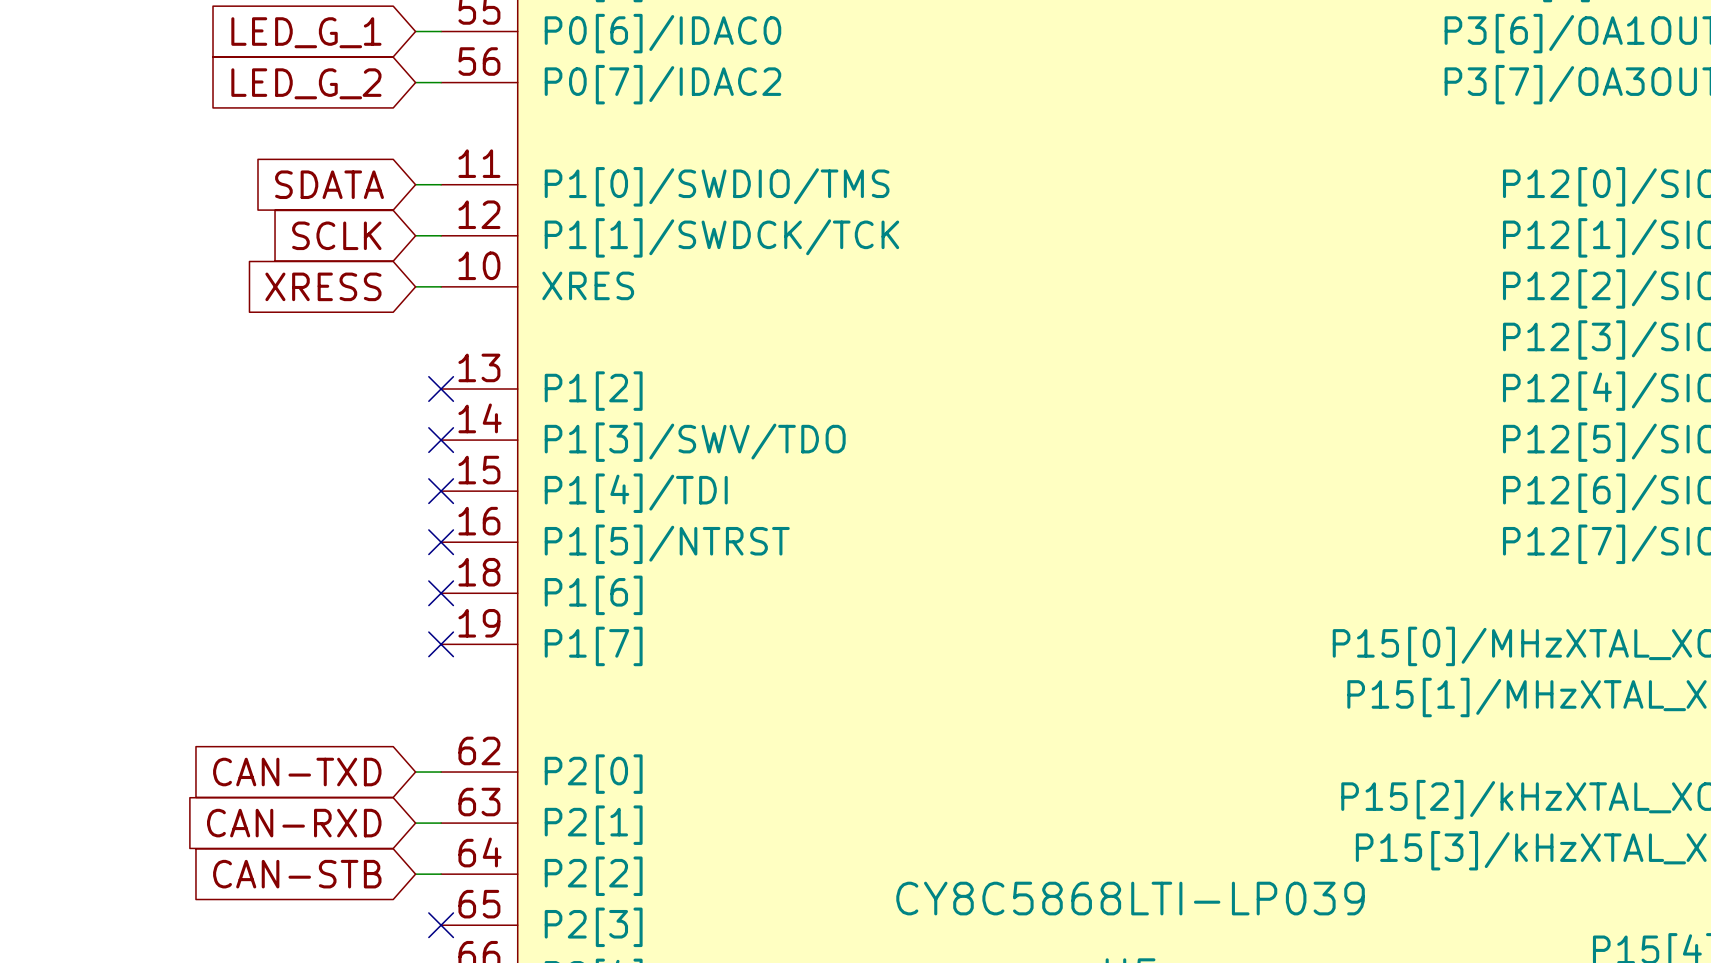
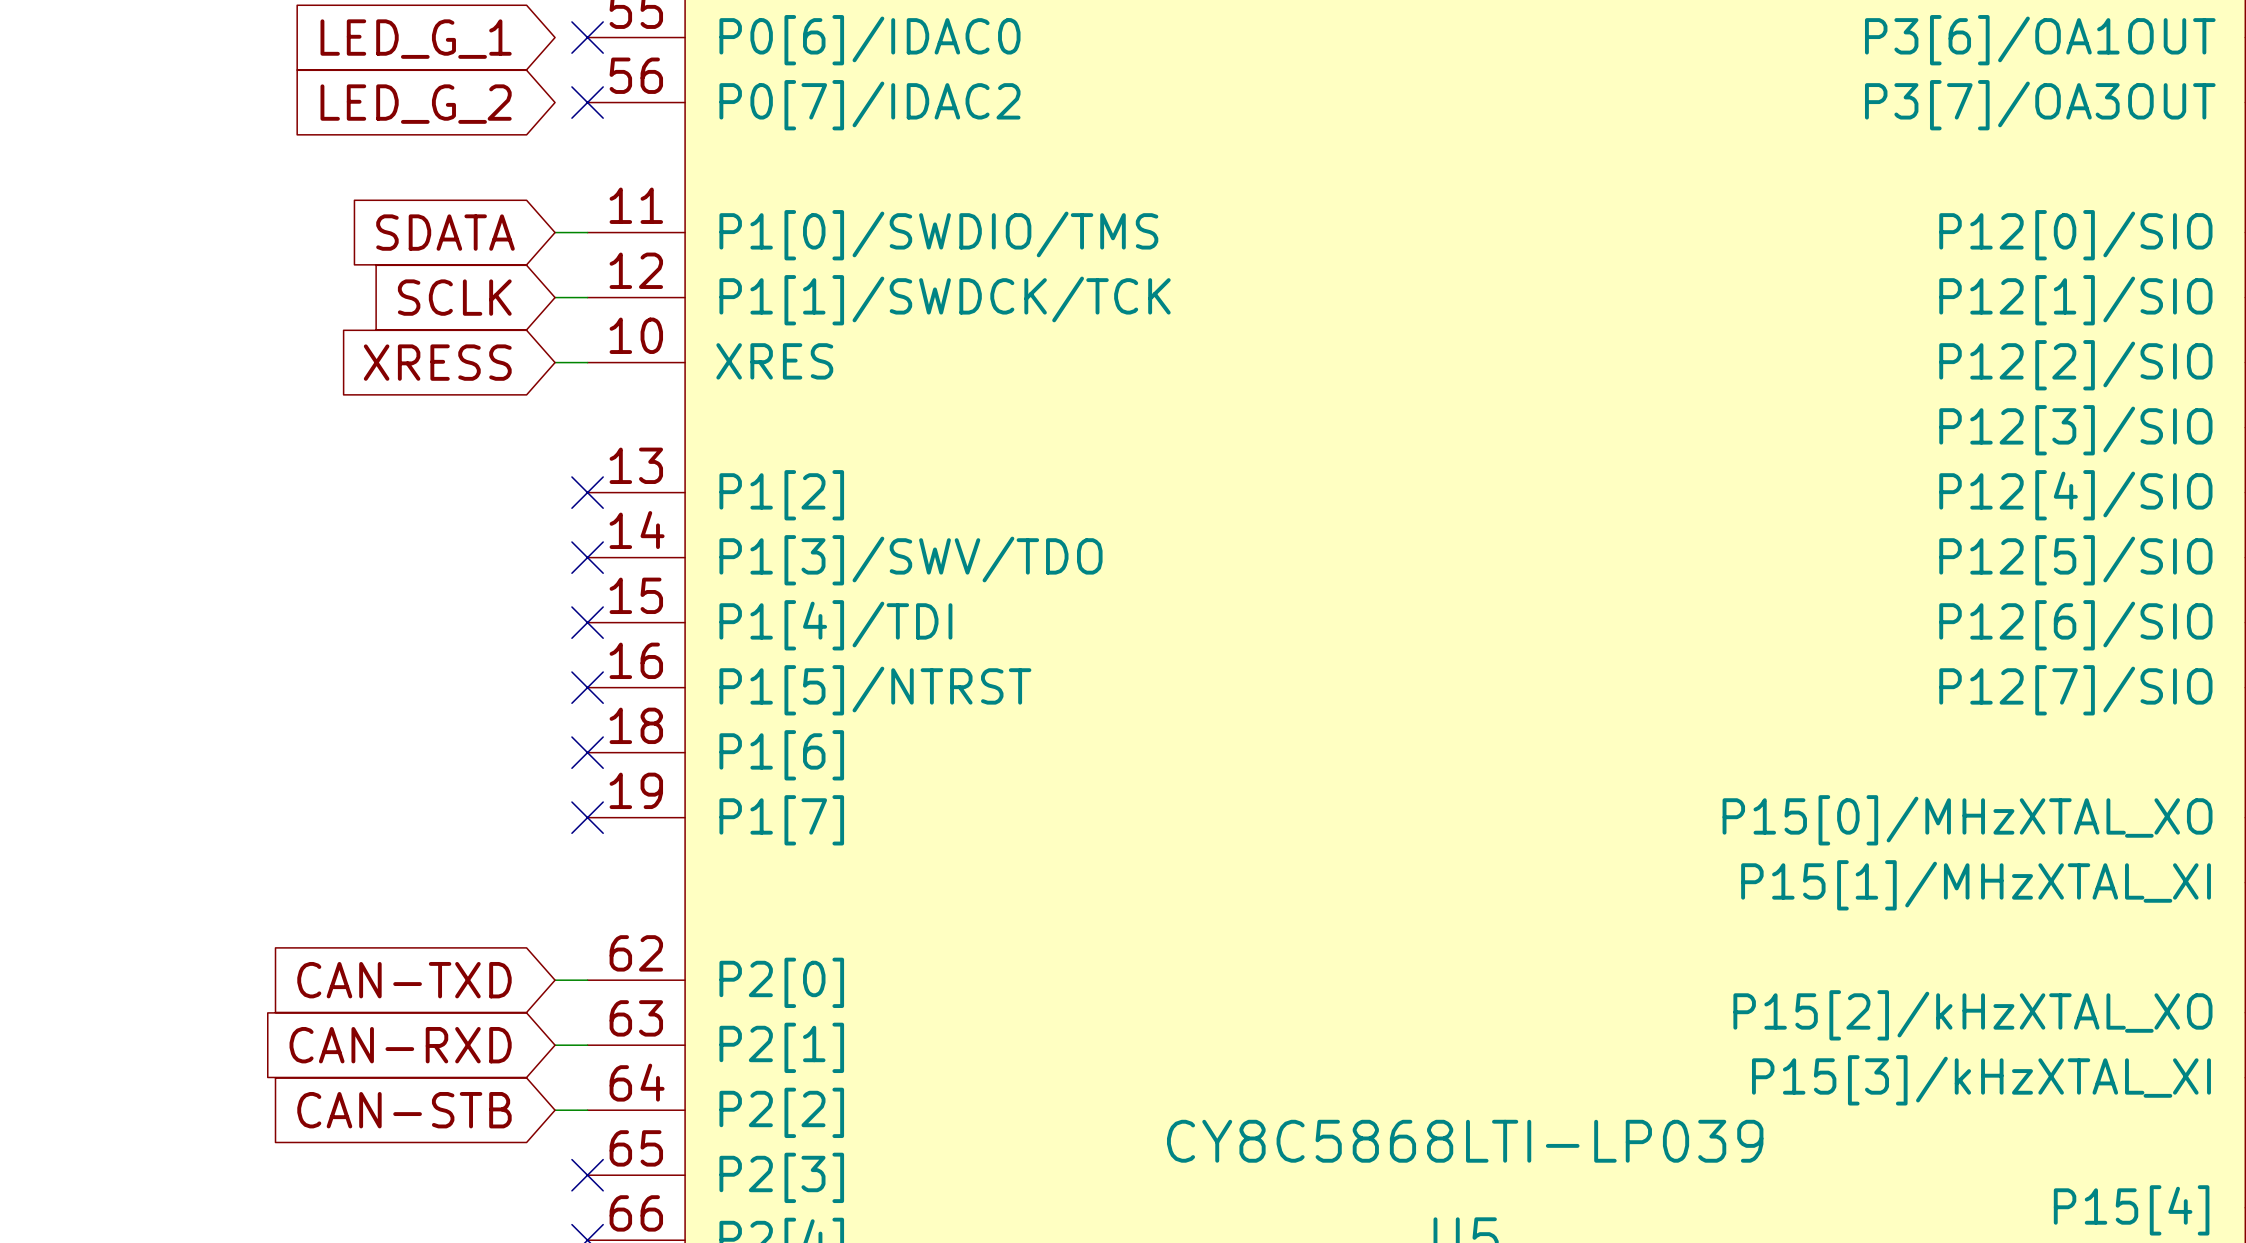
wire: (415, 31) (441, 31) -> none
no-connect mark: none -> (587, 37)
wire: (415, 82) (441, 82) -> none
no-connect mark: none -> (587, 102)

